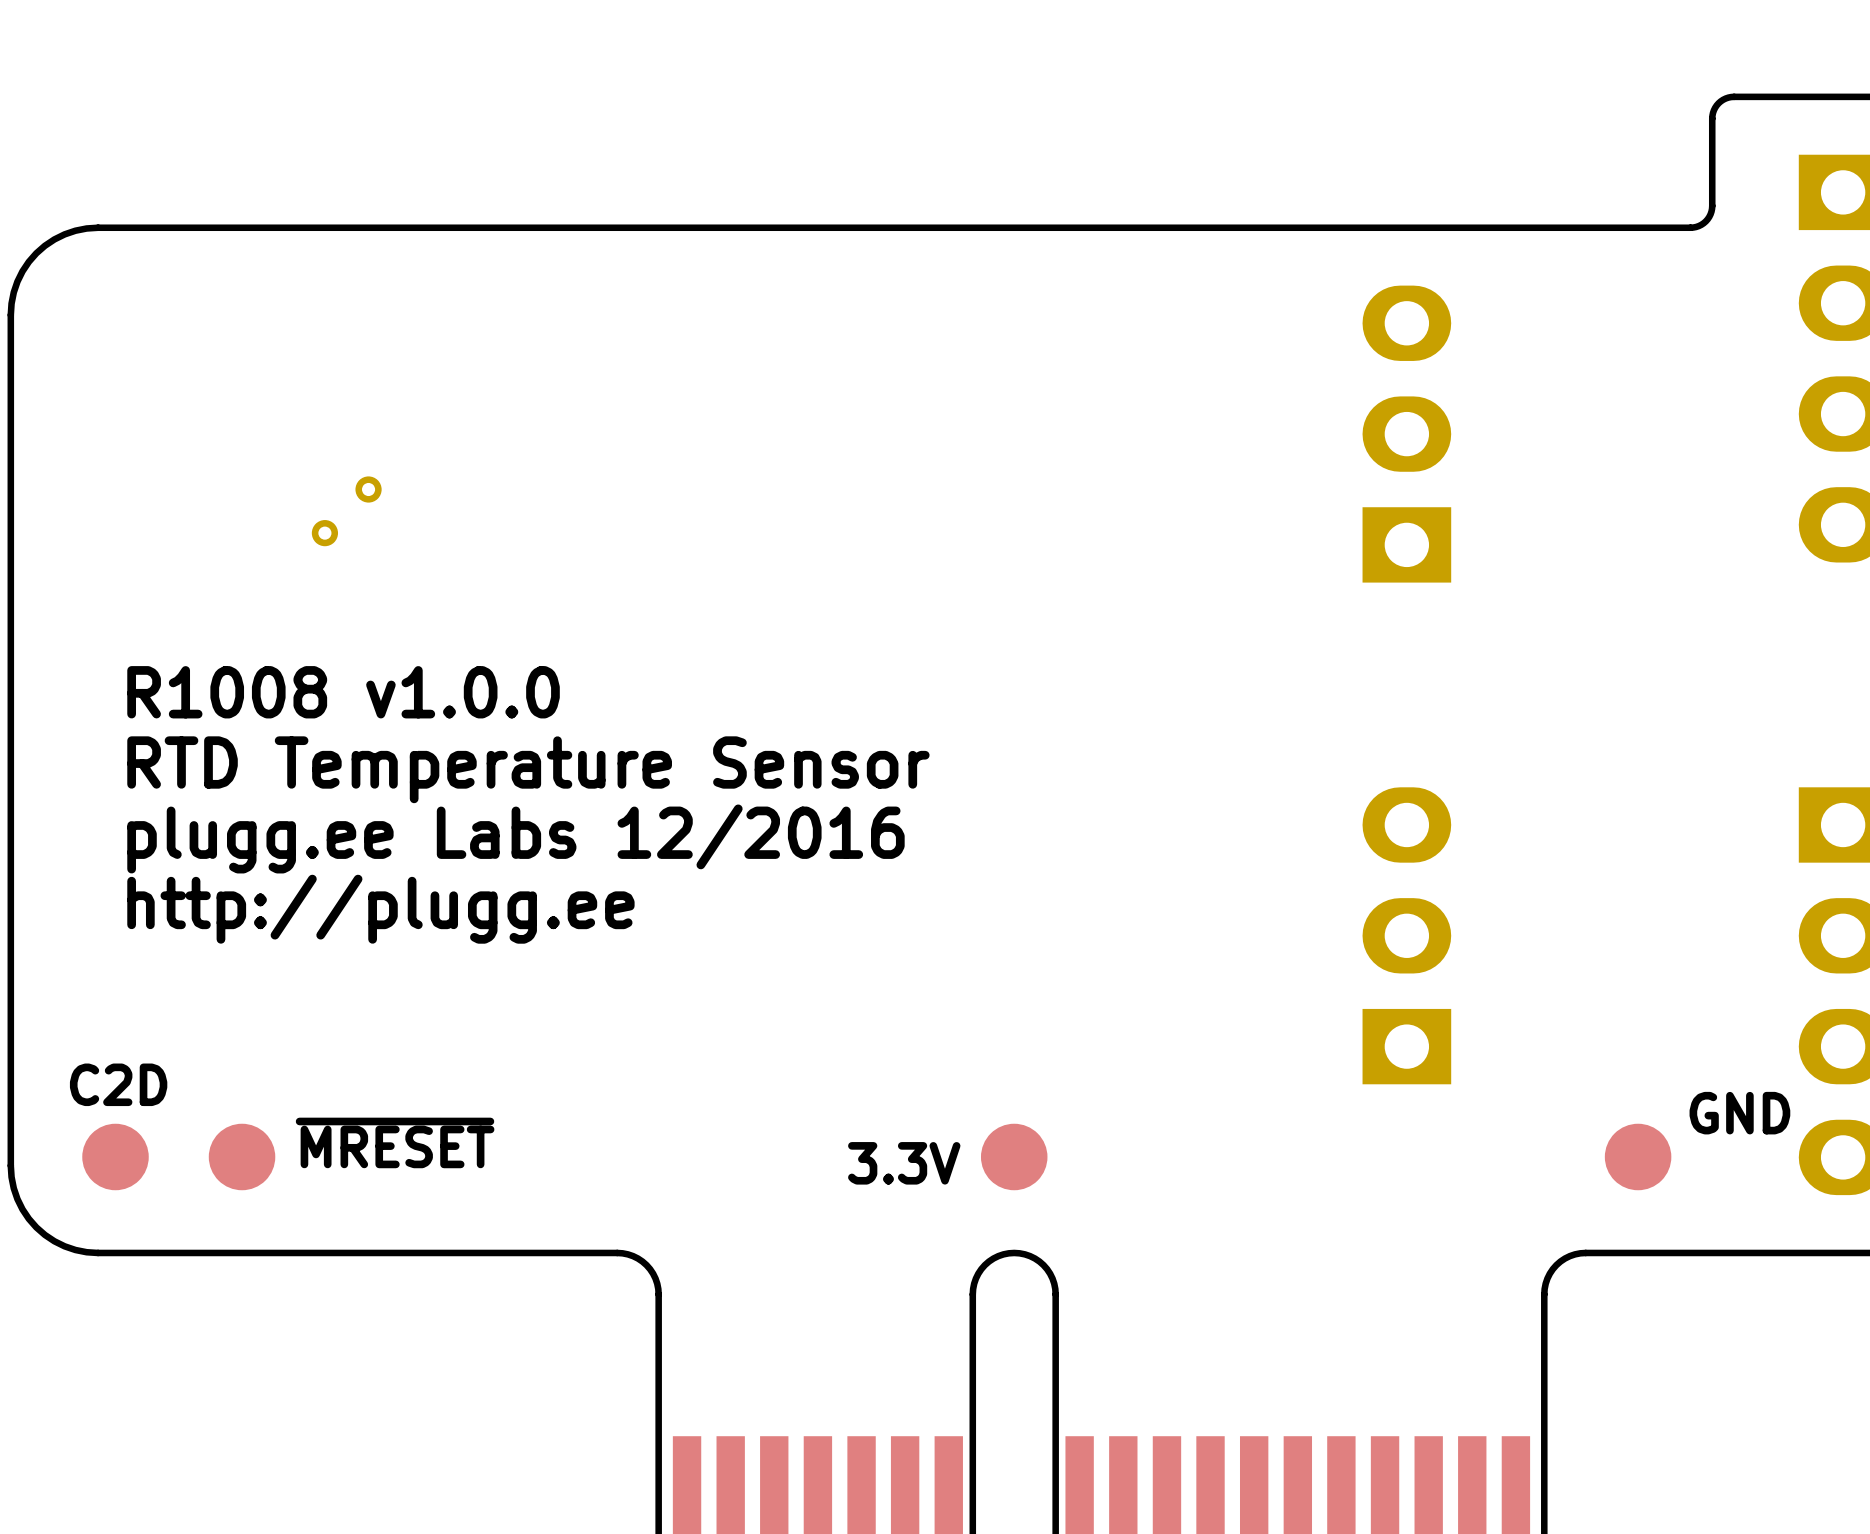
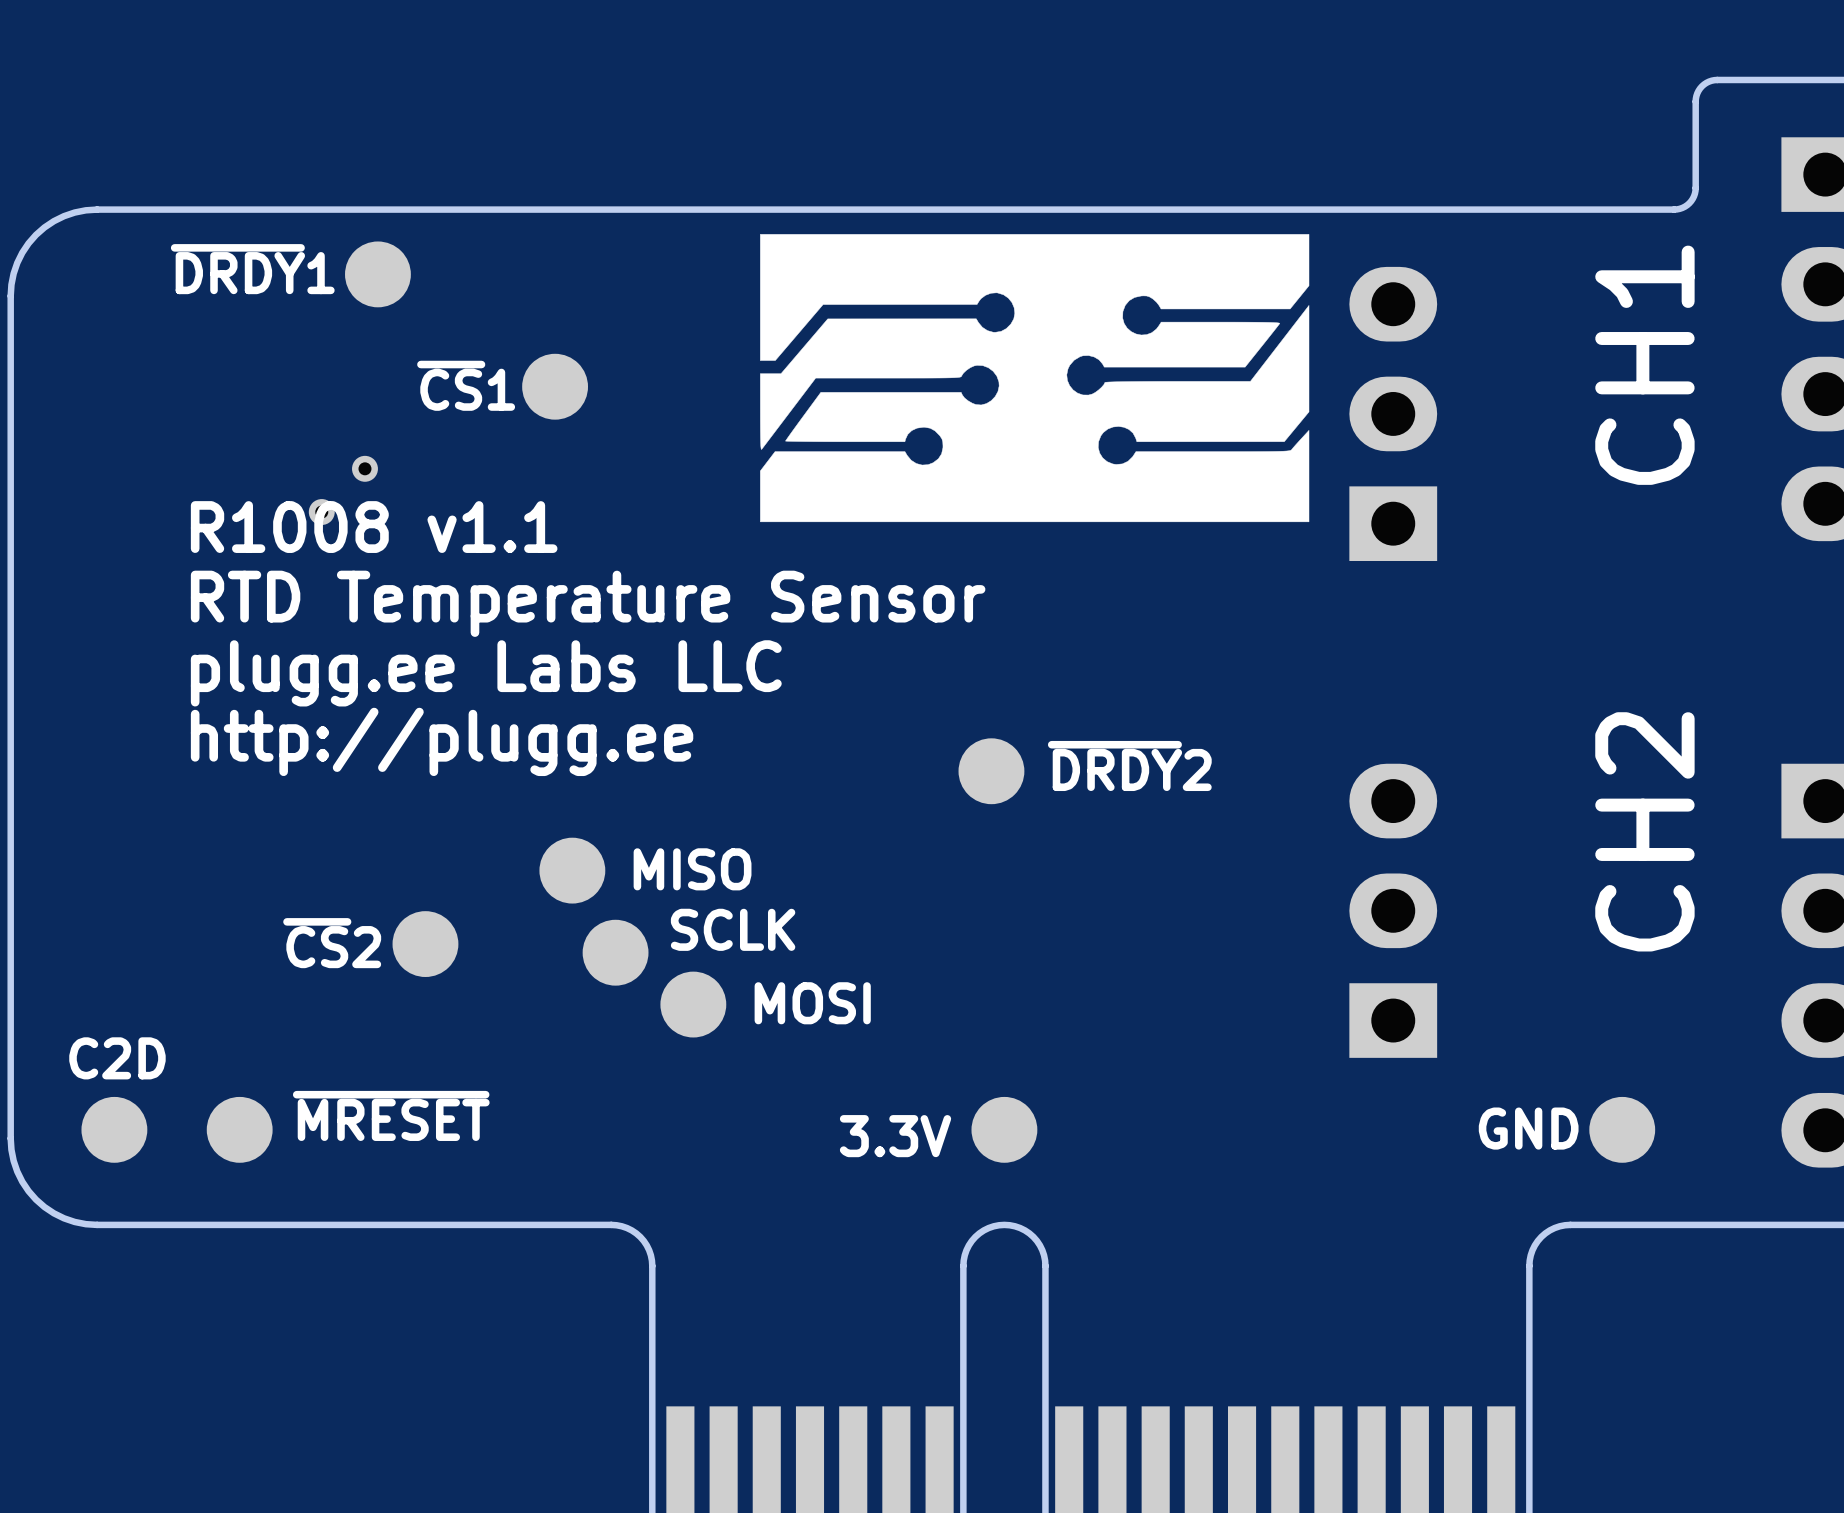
drawing: none -> [760, 234, 1310, 523]
text: none -> ~{DRDY}1 (252, 269)
part: none -> (377, 274)
text: none -> CH1 (1644, 365)
text: none -> ~{CS}1 (466, 385)
part: none -> (555, 386)
text: none -> R1008 v1.1 (374, 527)
text: R1008 v1.0.0 (343, 692) -> none
text: none -> plugg.ee Labs LLC (486, 673)
text position: RTD Temperature Sensor (528, 769) -> RTD Temperature Sensor (588, 603)
text: none -> ~{DRDY}2 (1129, 765)
part: none -> (991, 771)
text: plugg.ee Labs 12/2016 (515, 838) -> none
text: none -> CH2 (1644, 831)
text: none -> MISO (692, 869)
part: none -> (572, 870)
text position: http://plugg.ee (380, 909) -> http://plugg.ee (442, 741)
text: none -> SCLK (733, 929)
text: none -> ~{CS}2 (332, 943)
part: none -> (425, 944)
part: none -> (615, 952)
text: none -> MOSI (812, 1003)
part: none -> (693, 1004)
text position: GND (1739, 1113) -> GND (1528, 1128)

